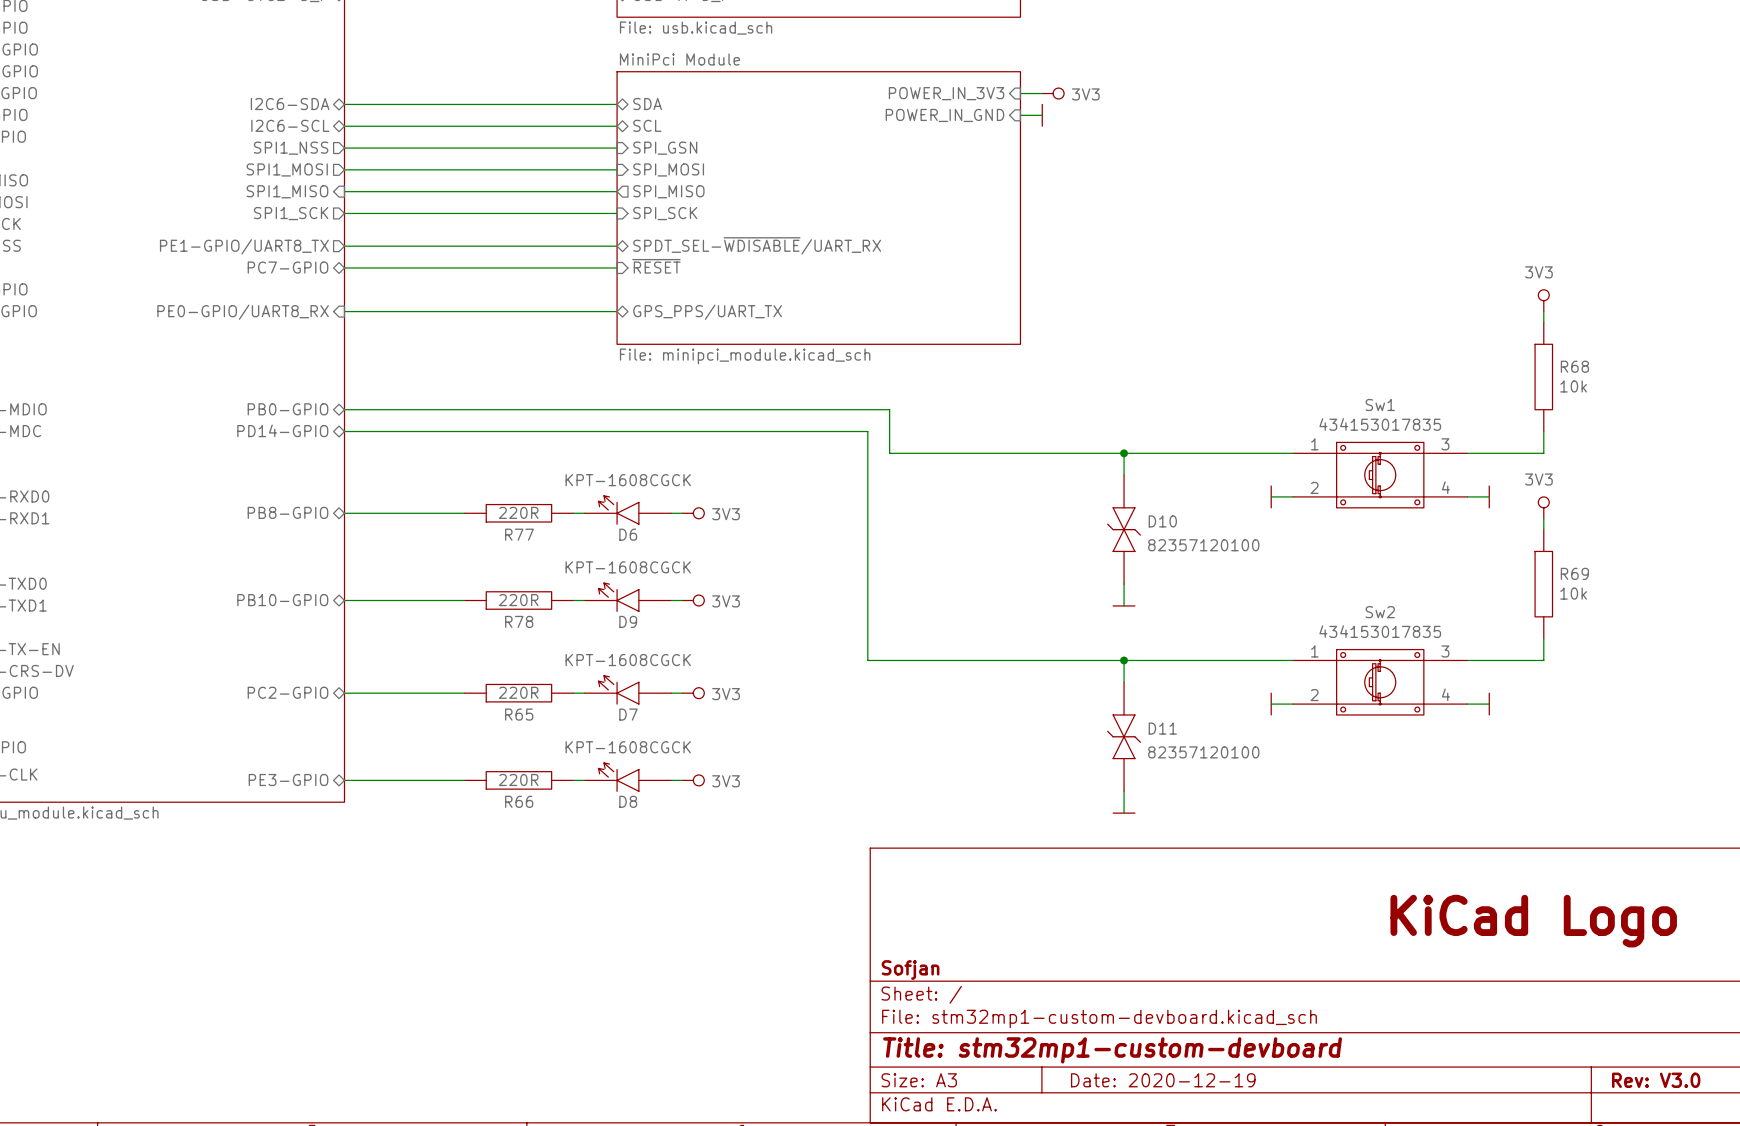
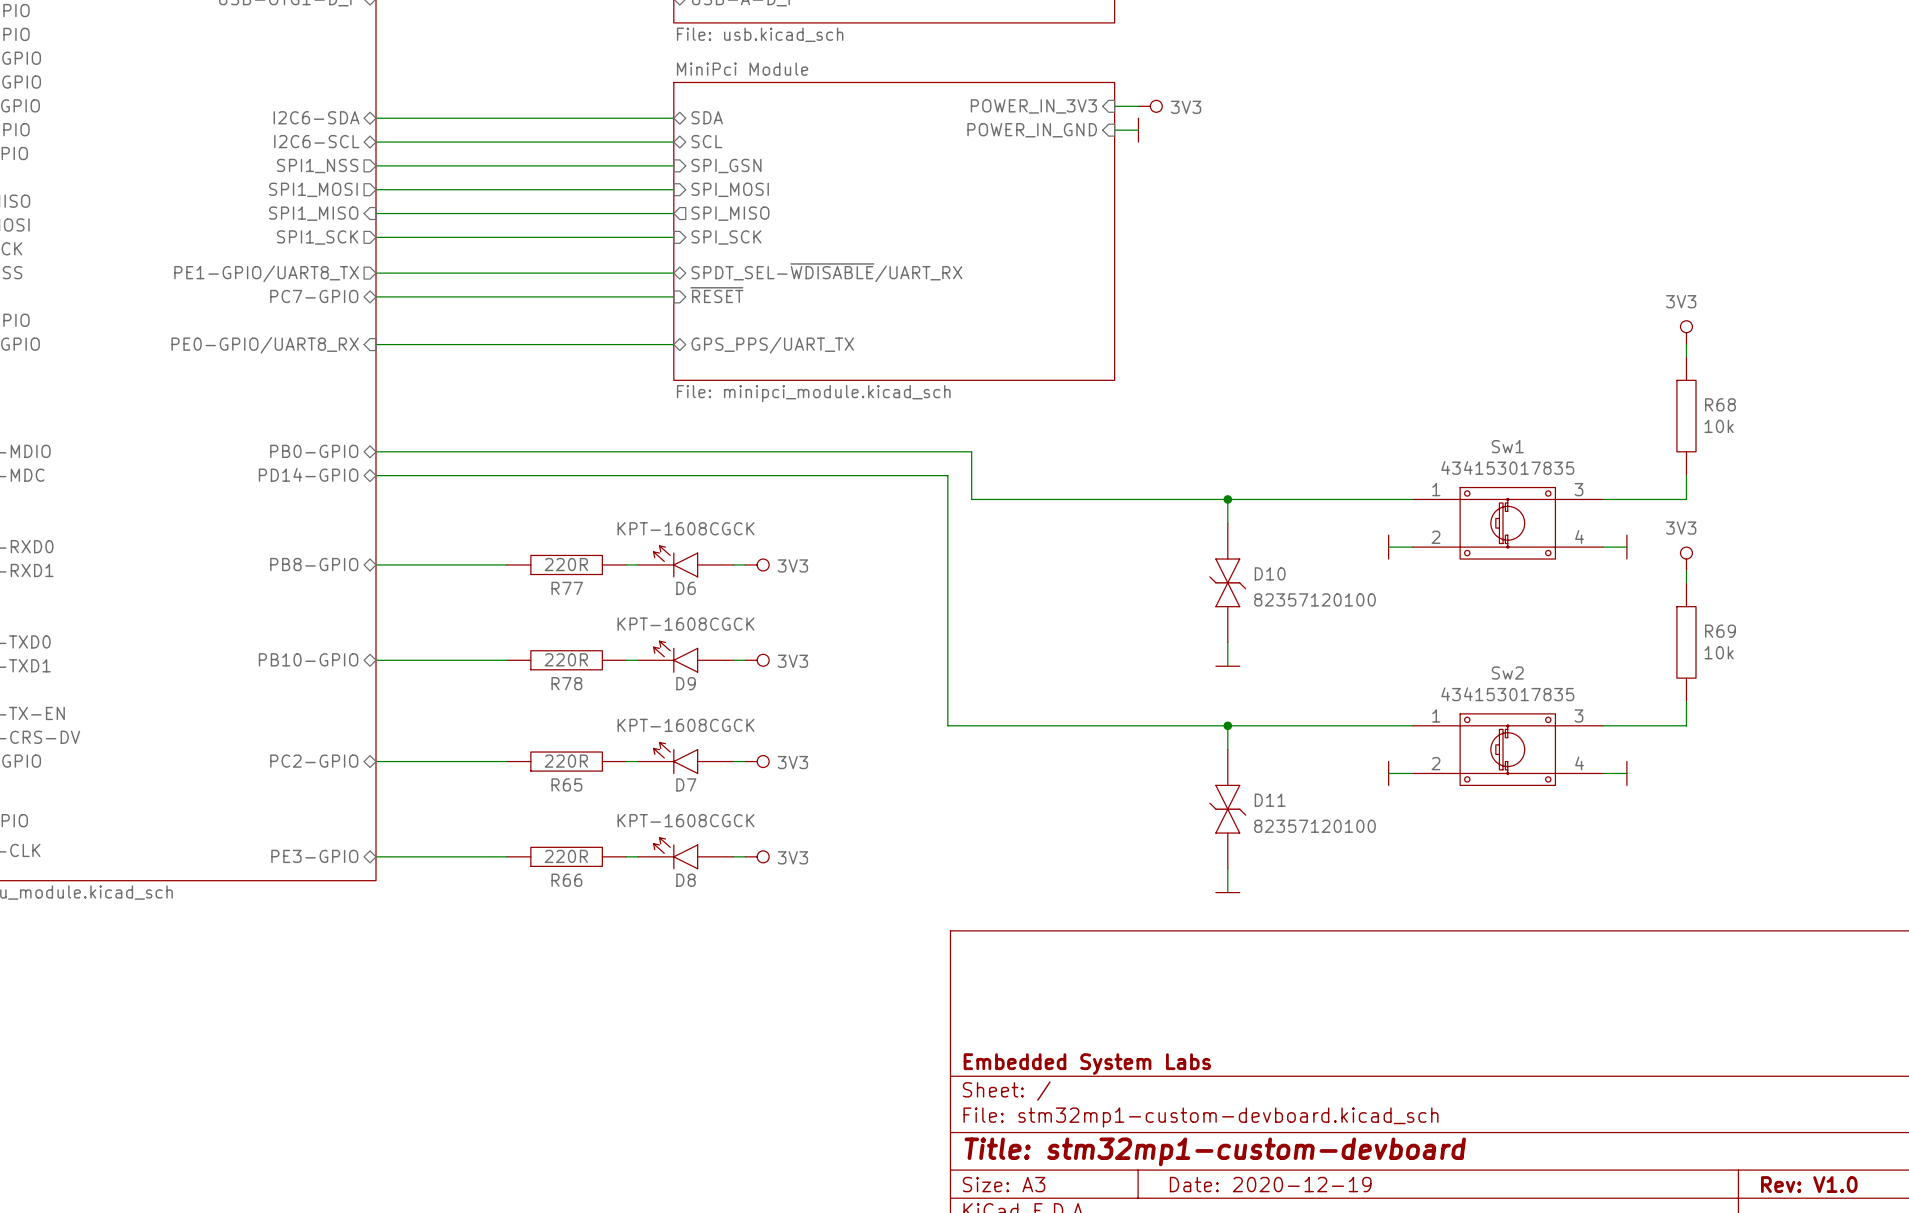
part: (1533, 921) -> none
title block: Sofjan (910, 969) -> Embedded System Labs (1087, 1064)
title block: Rev: V3.0 (1656, 1080) -> Rev: V1.0 (1809, 1184)

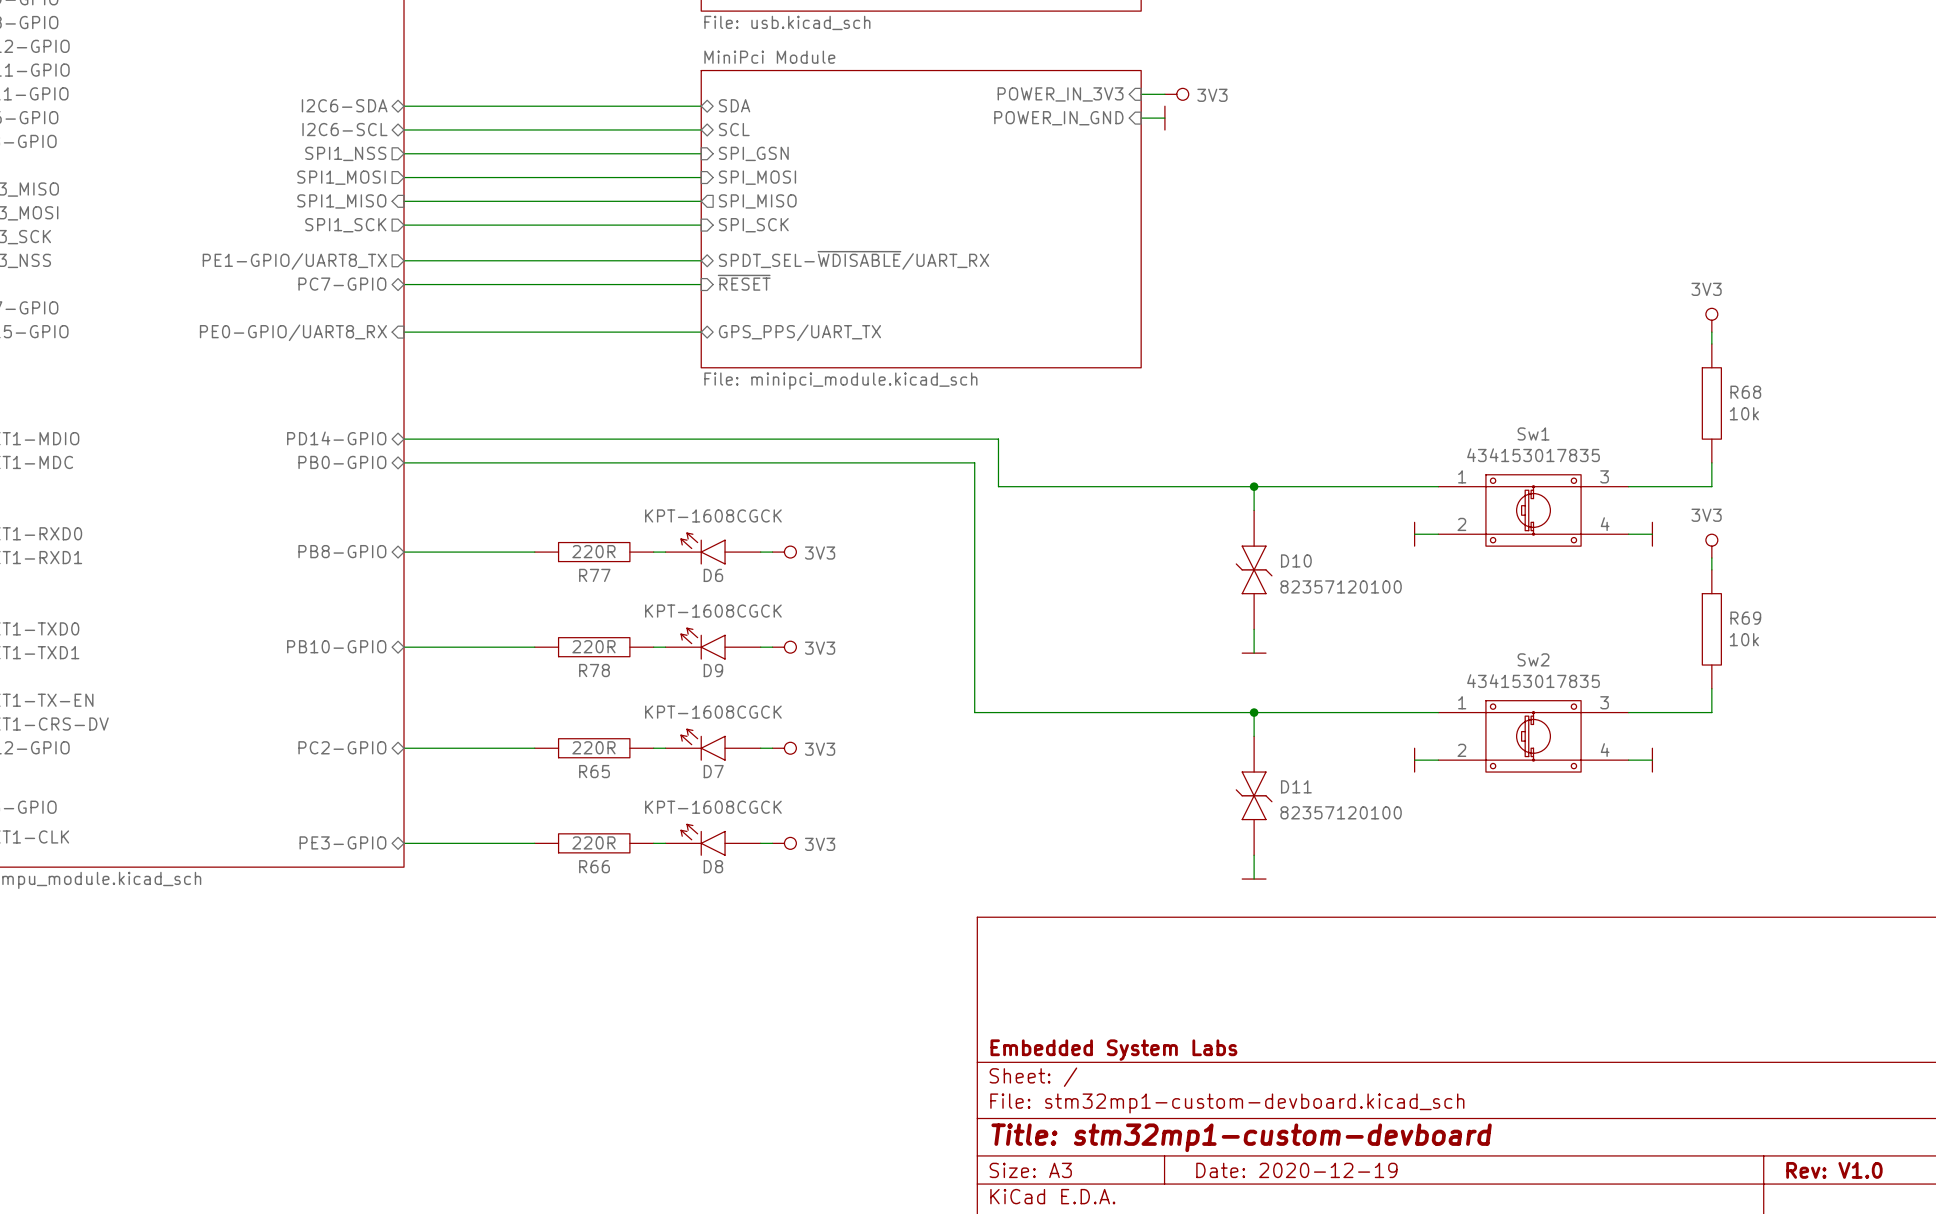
sheet pin: PB0-GPIO (314, 451) -> PD14-GPIO (336, 438)
sheet pin: PD14-GPIO (308, 474) -> PB0-GPIO (342, 462)

